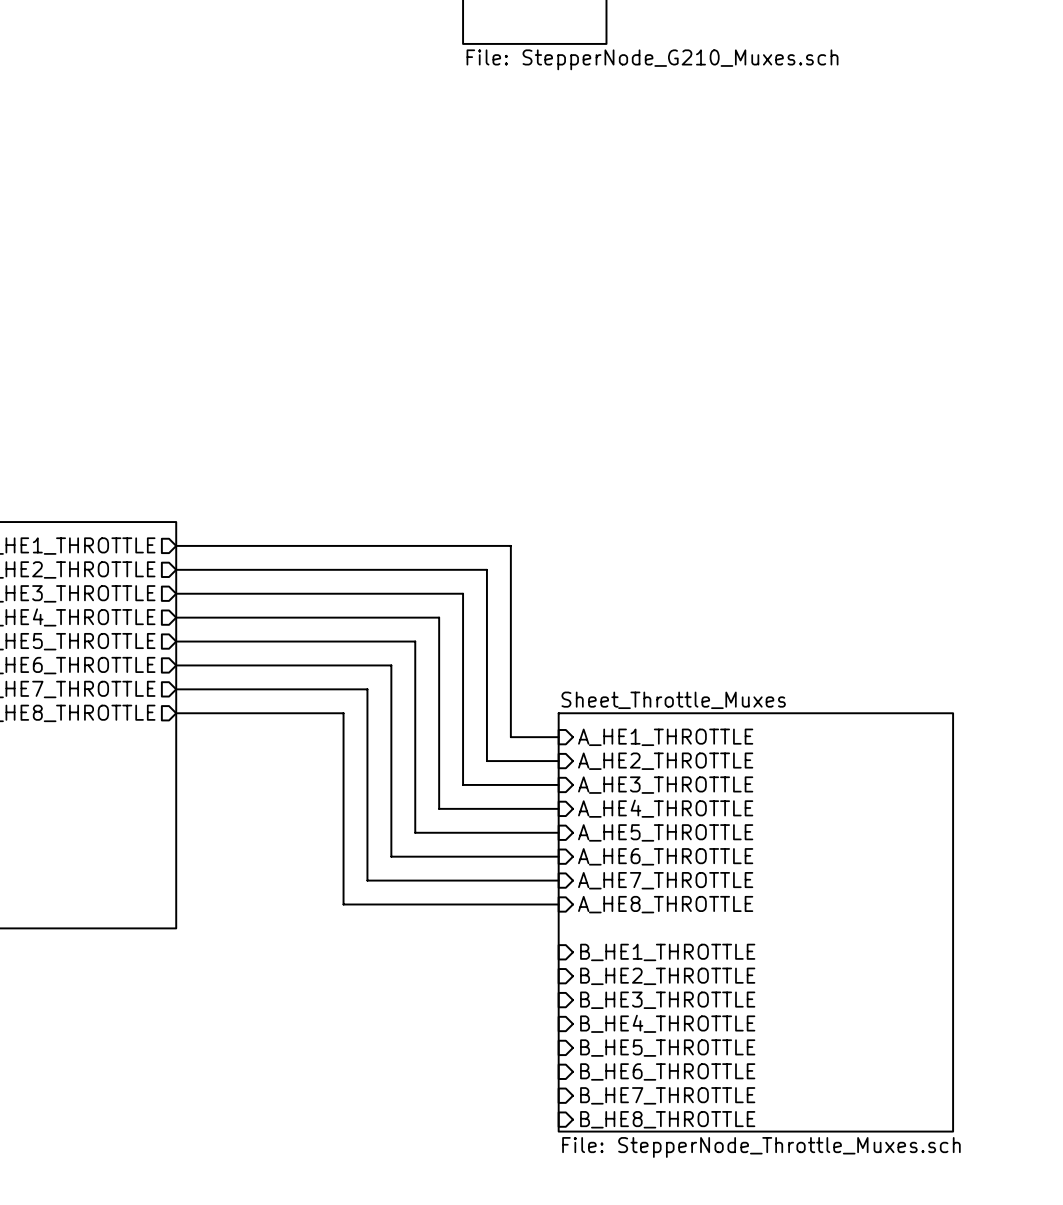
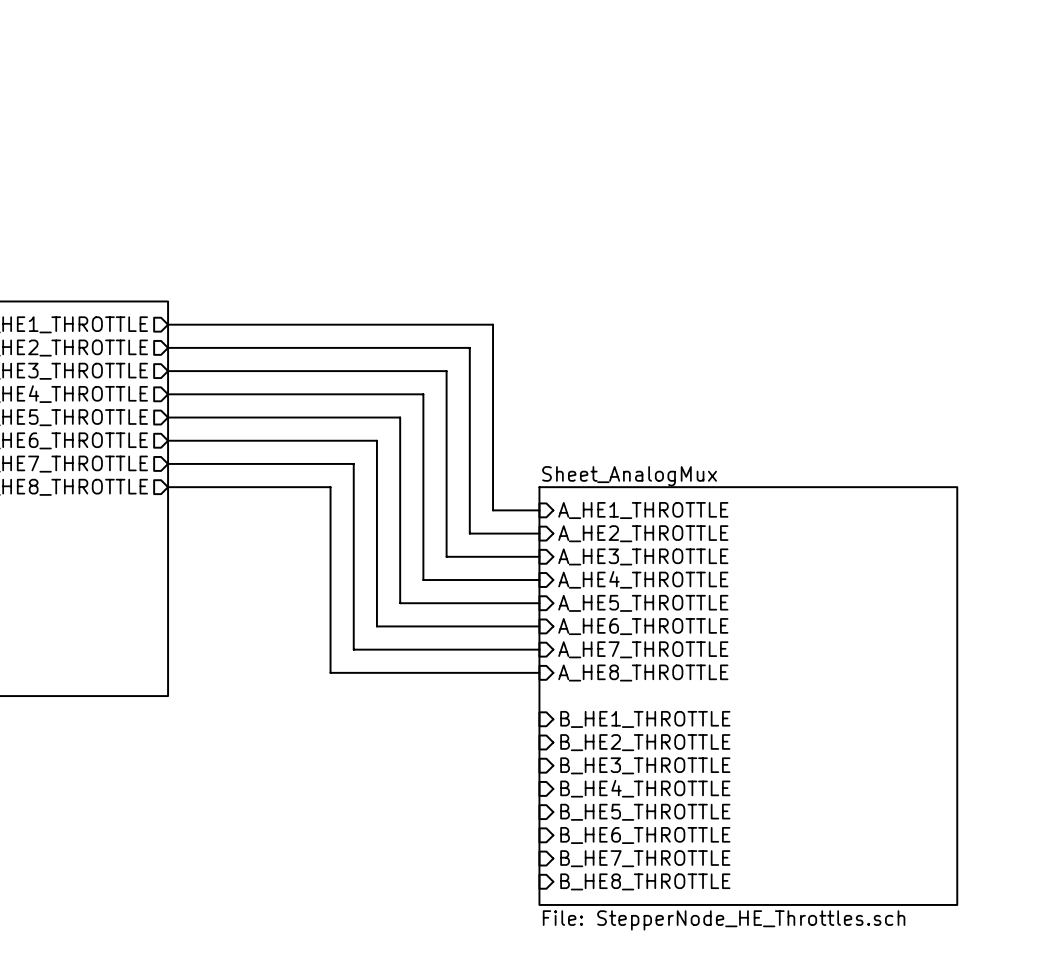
sheet Sheet_Throttle_Muxes: File: StepperNode_Throttle_Muxes.sch (755, 922) -> none
sheet Sheet_AnalogMux: none -> File: StepperNode_HE_Throttles.sch (748, 696)

